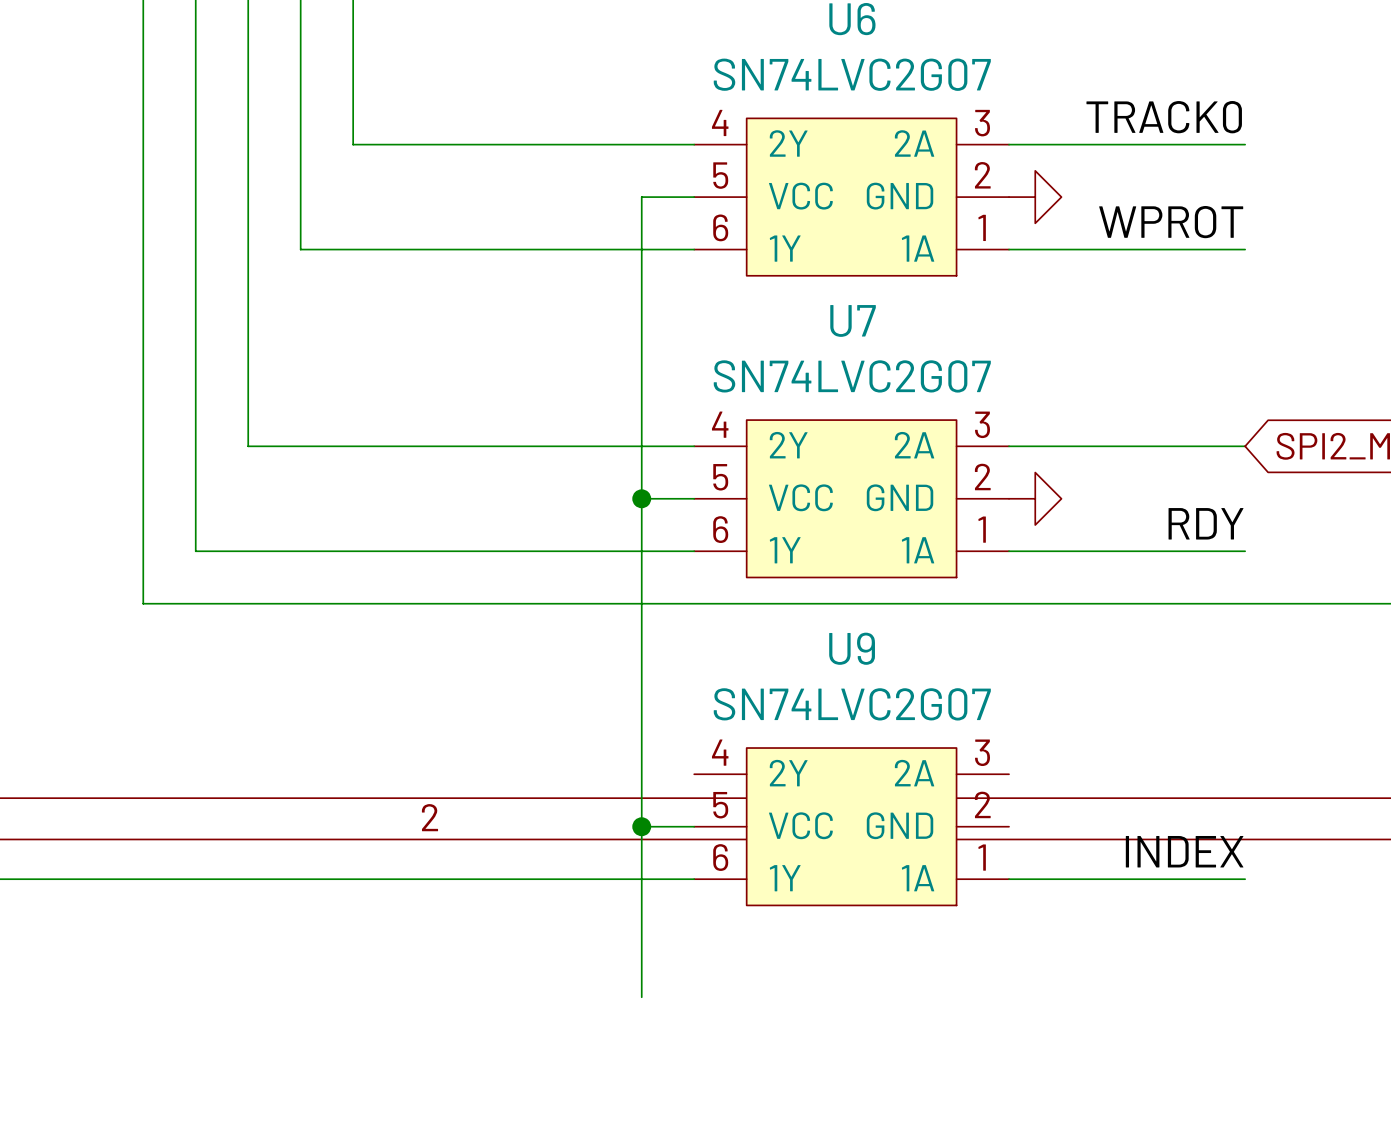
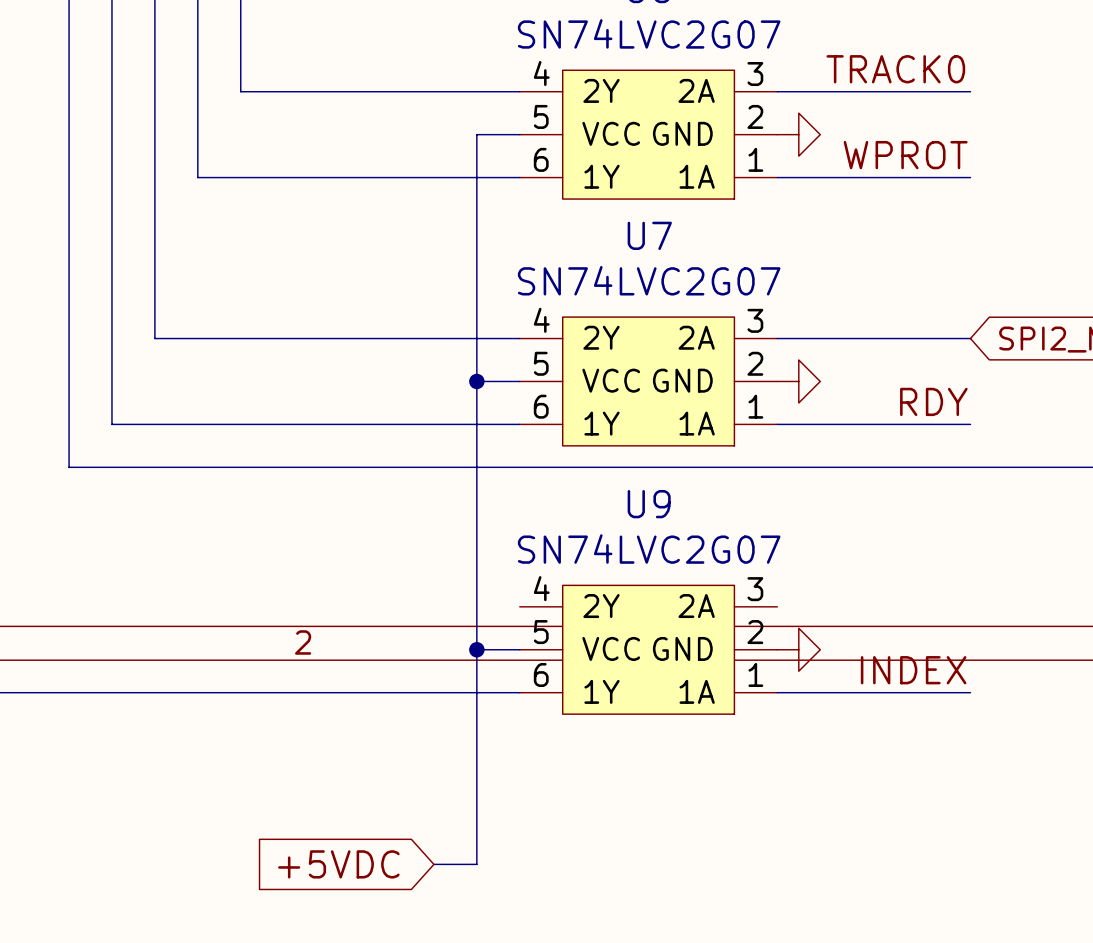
power symbol: none -> (798, 649)
wire: none -> (476, 789) (476, 864) (433, 864)
global label: none -> +5VDC (338, 864)

